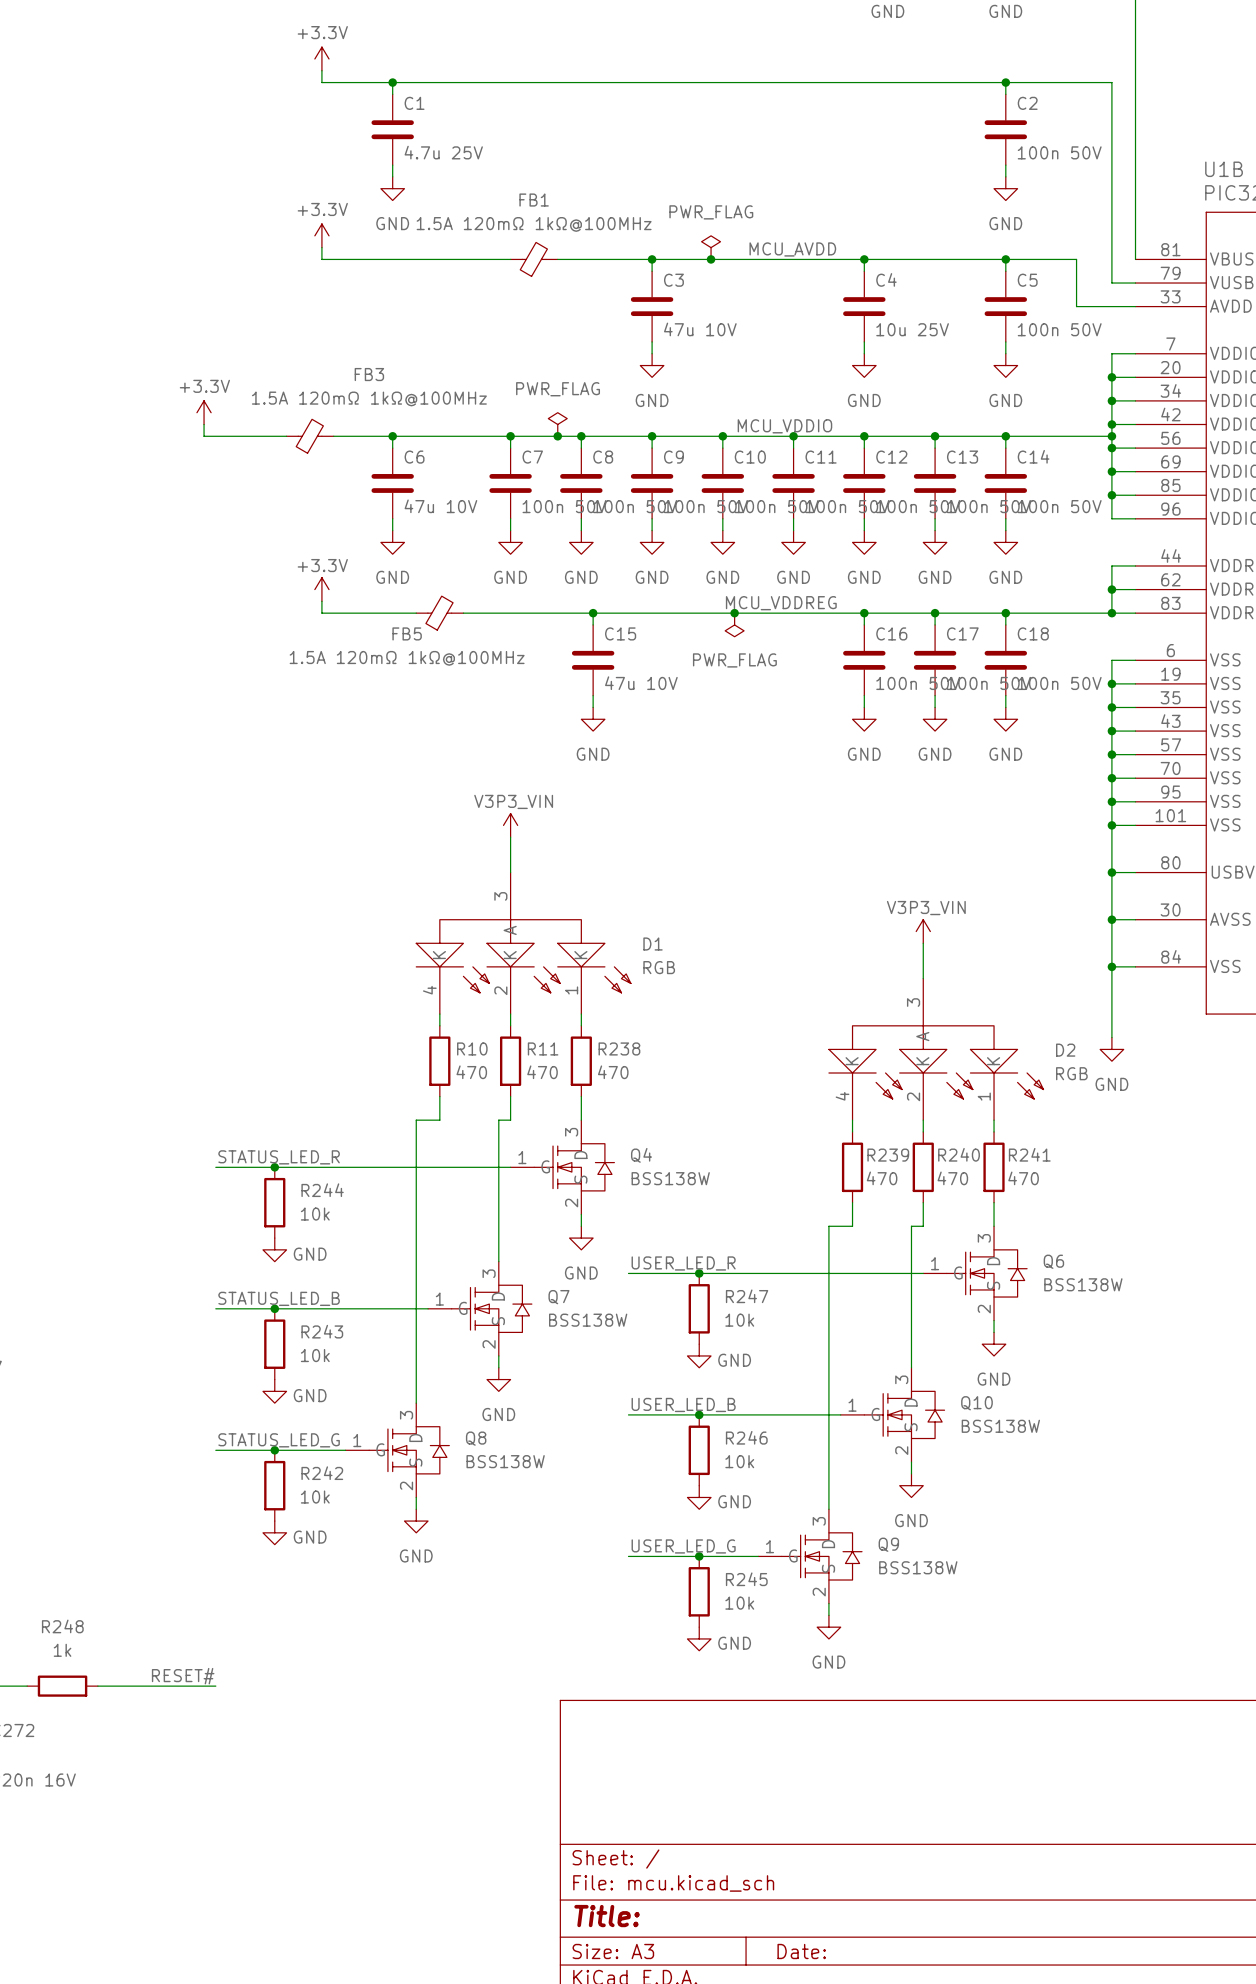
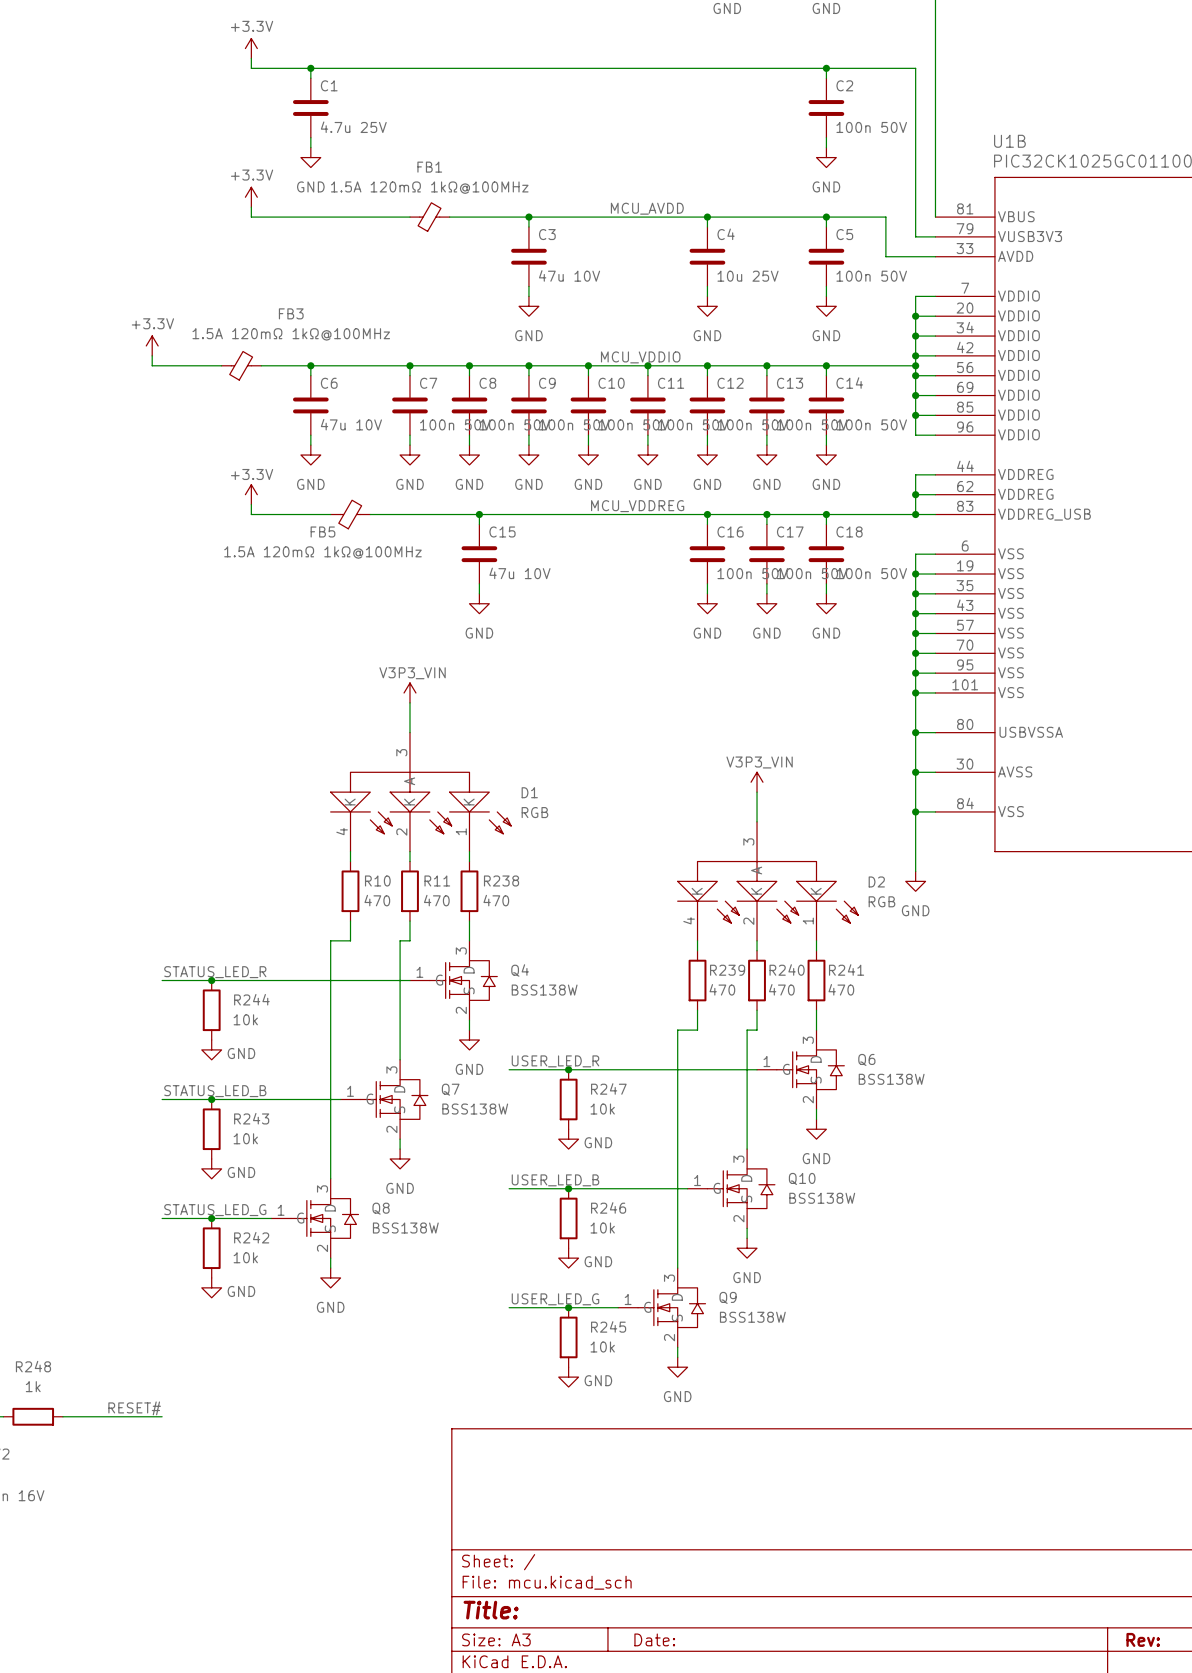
power symbol: PWR_FLAG (711, 247) -> none
junction: (711, 259) -> none
power symbol: PWR_FLAG (557, 424) -> none
junction: (557, 436) -> none
junction: (734, 613) -> none
power symbol: PWR_FLAG (734, 624) -> none

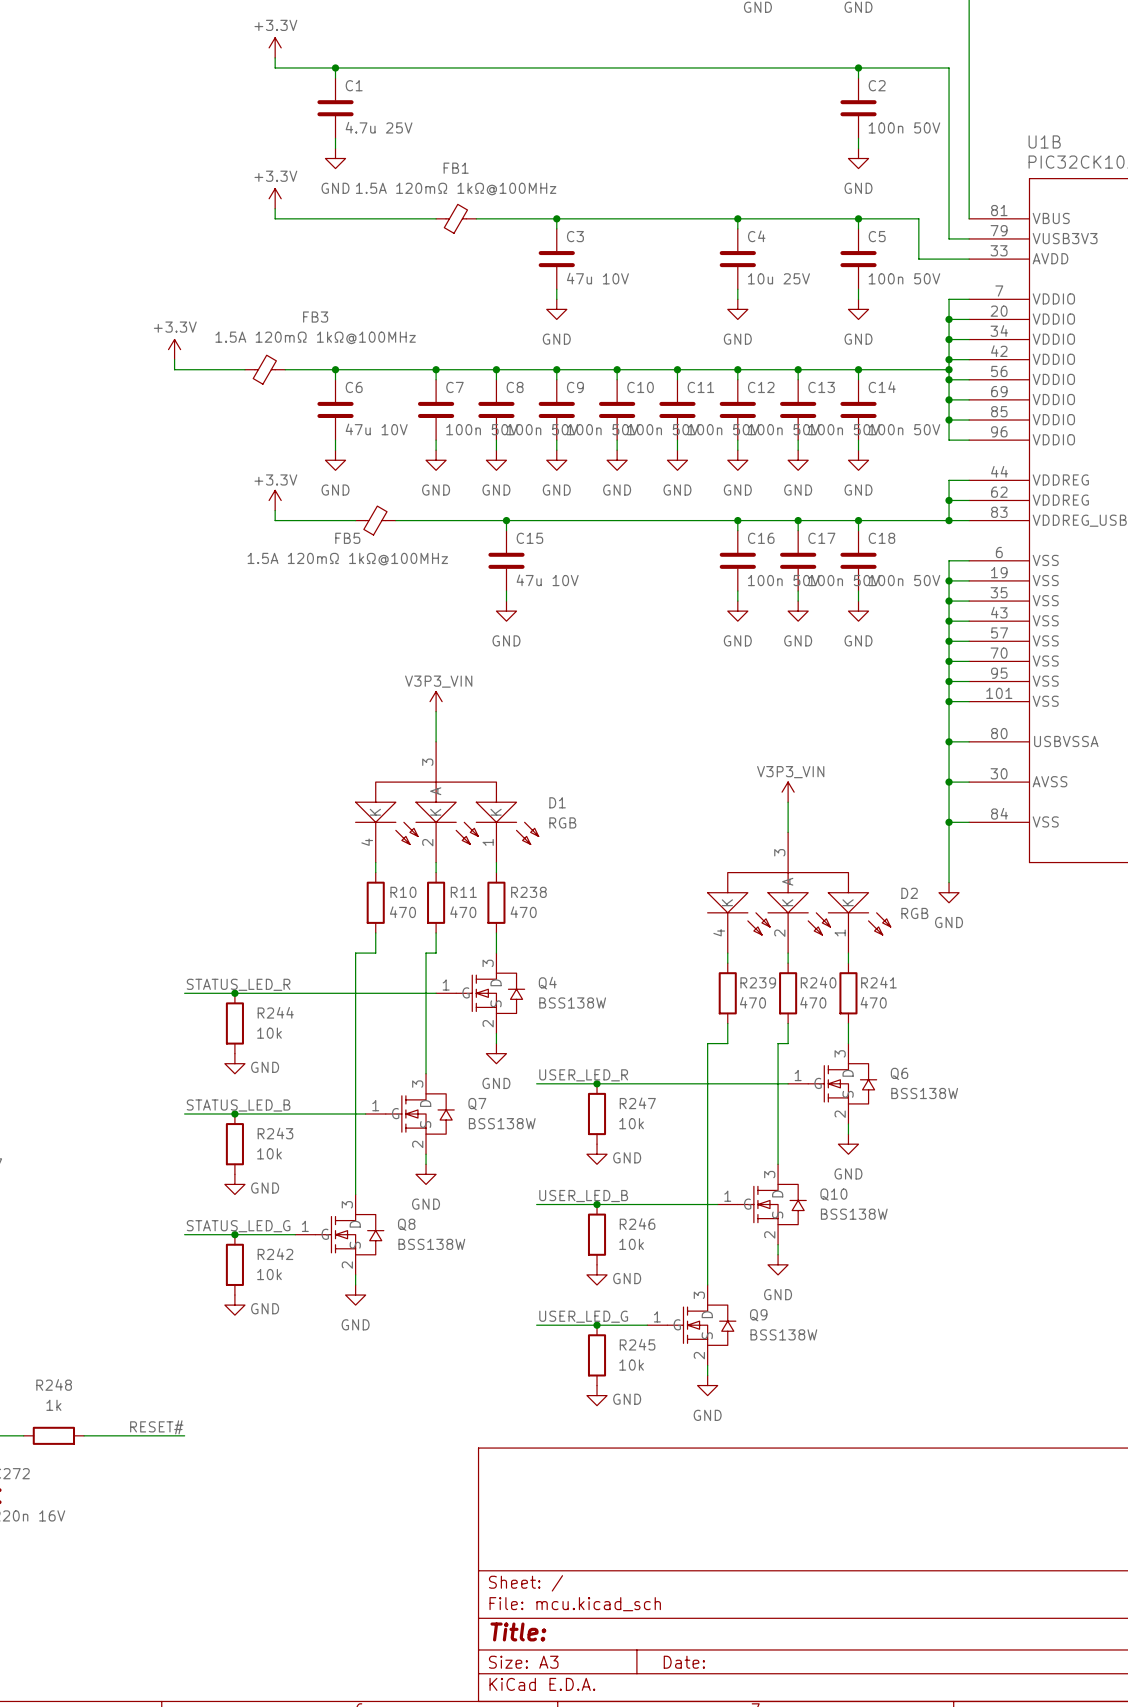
label: MCU_AVDD (647, 208) -> none
label: MCU_VDDIO (640, 357) -> none
label: MCU_VDDREG (637, 506) -> none

